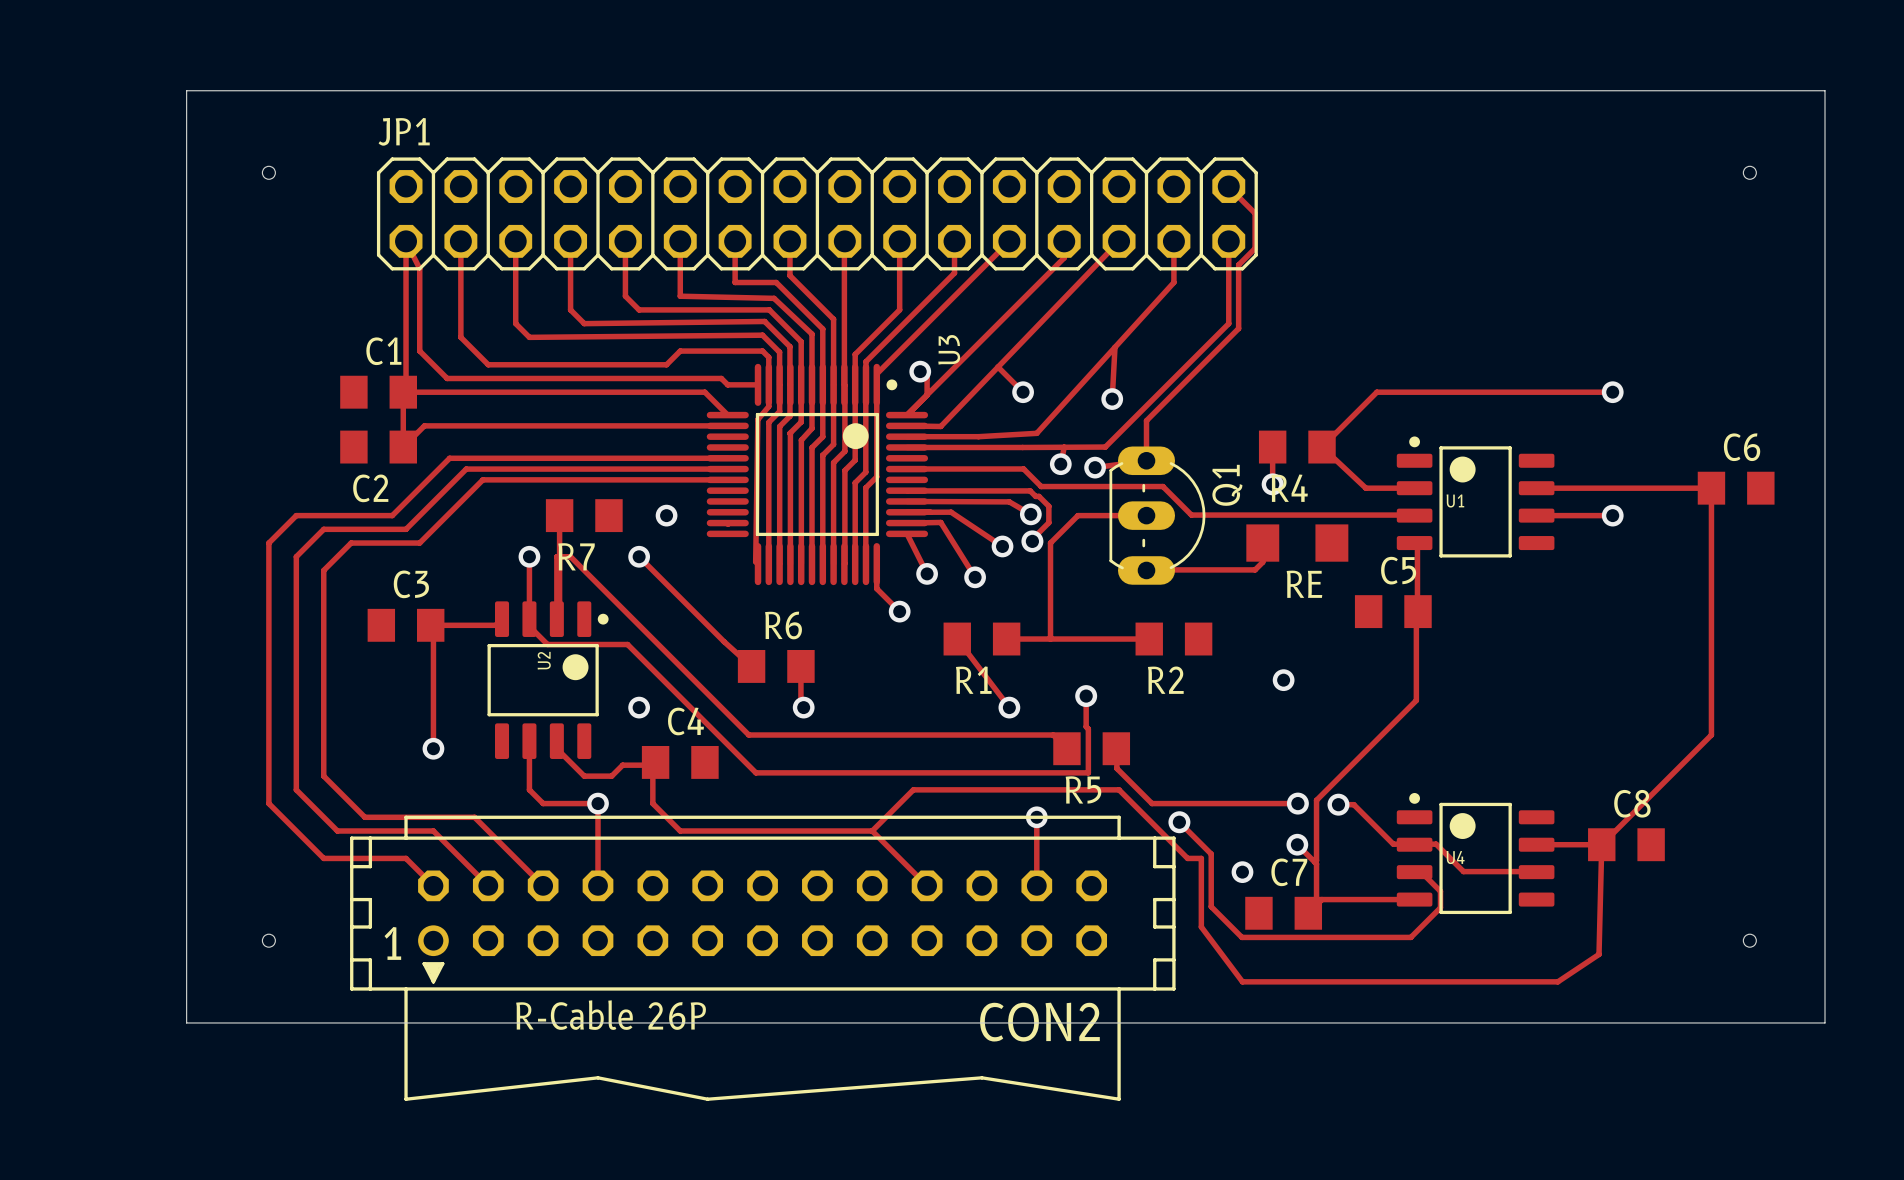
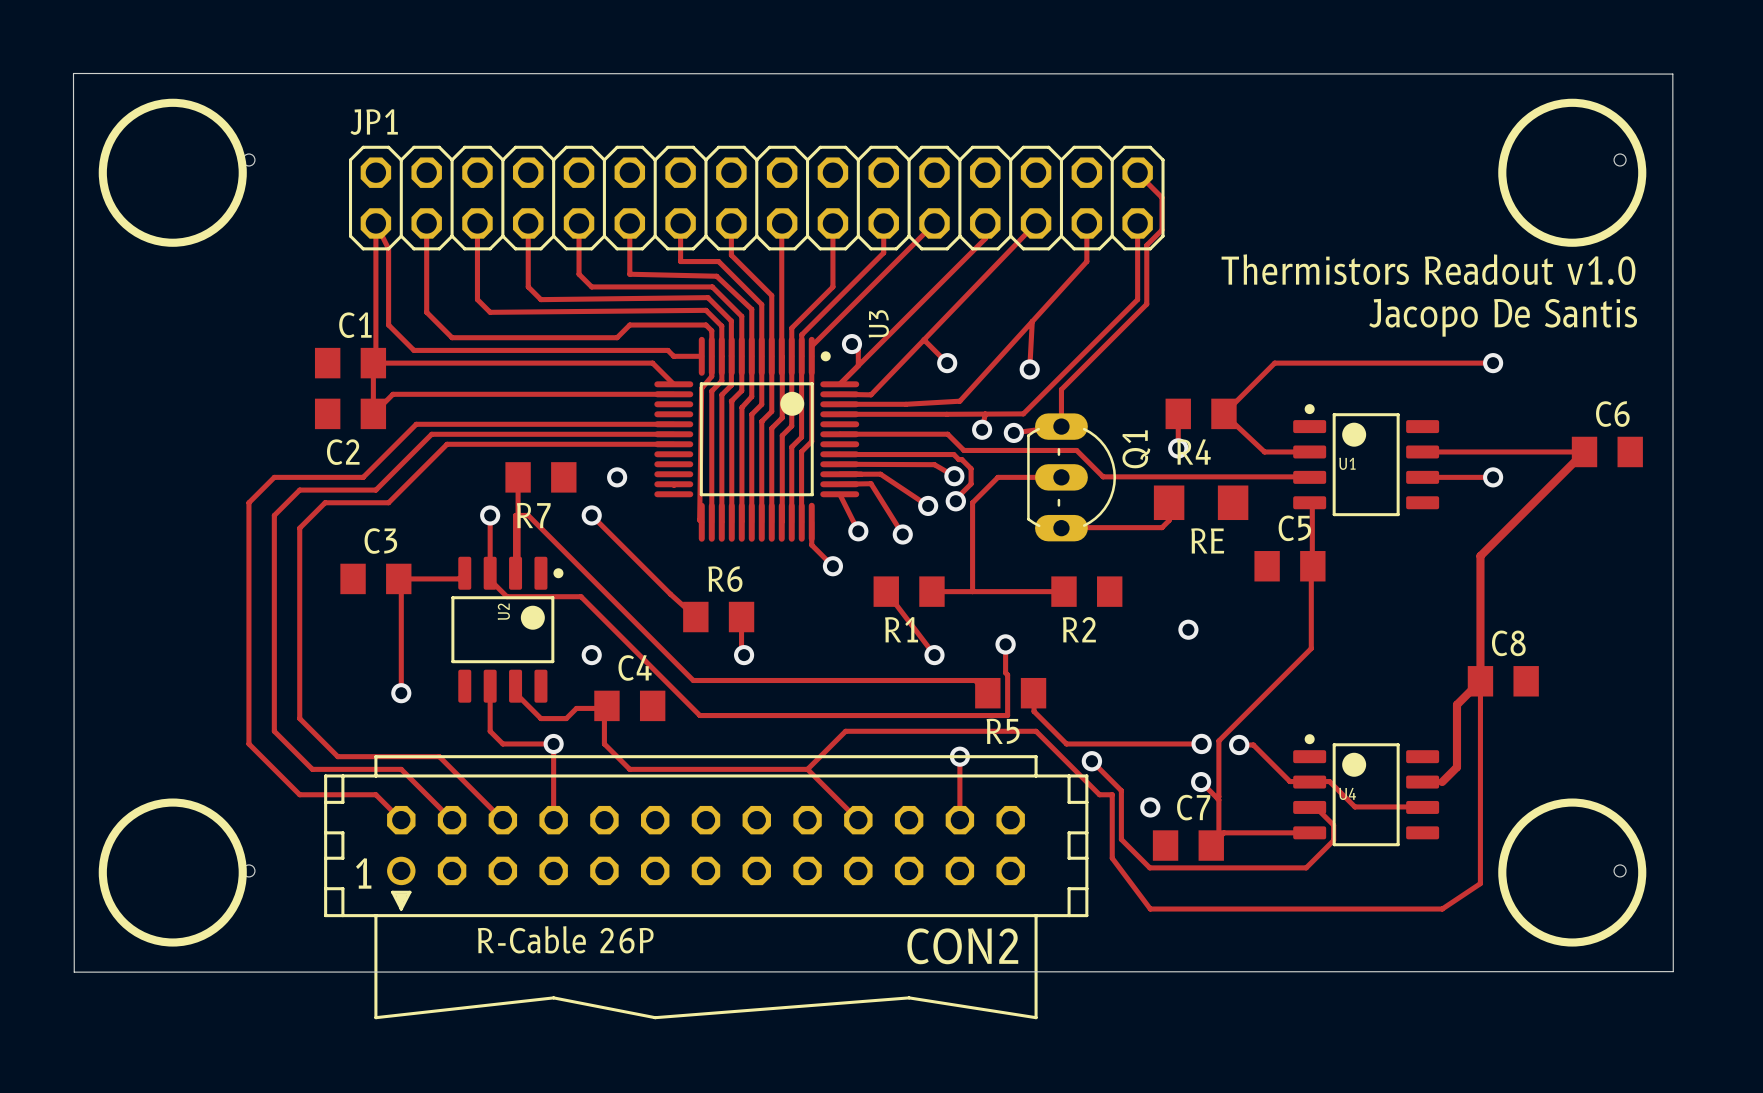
board edge: (186, 90) (1825, 90) (1825, 1022) (186, 1022) (186, 90) -> (73, 73) (74, 972) (1673, 971) (1672, 74) (73, 73)
drawing: none -> [98, 98, 247, 247]
drawing: none -> [1498, 98, 1647, 247]
text: none -> Thermistors Readout v1.0 (1428, 269)
text: none -> Jacopo De Santis (1503, 317)
track: (1711, 488) (1711, 735) (1601, 844) -> (1584, 451) (1480, 556) (1480, 681)
track: (1557, 844) (1601, 844) -> (1442, 782) (1457, 767) (1457, 704) (1480, 681)
track: (1601, 844) (1599, 954) -> (1480, 681) (1480, 883)
C8 position: (1626, 844) -> (1503, 681)
drawing: none -> [98, 798, 247, 947]
drawing: none -> [1498, 798, 1647, 947]

